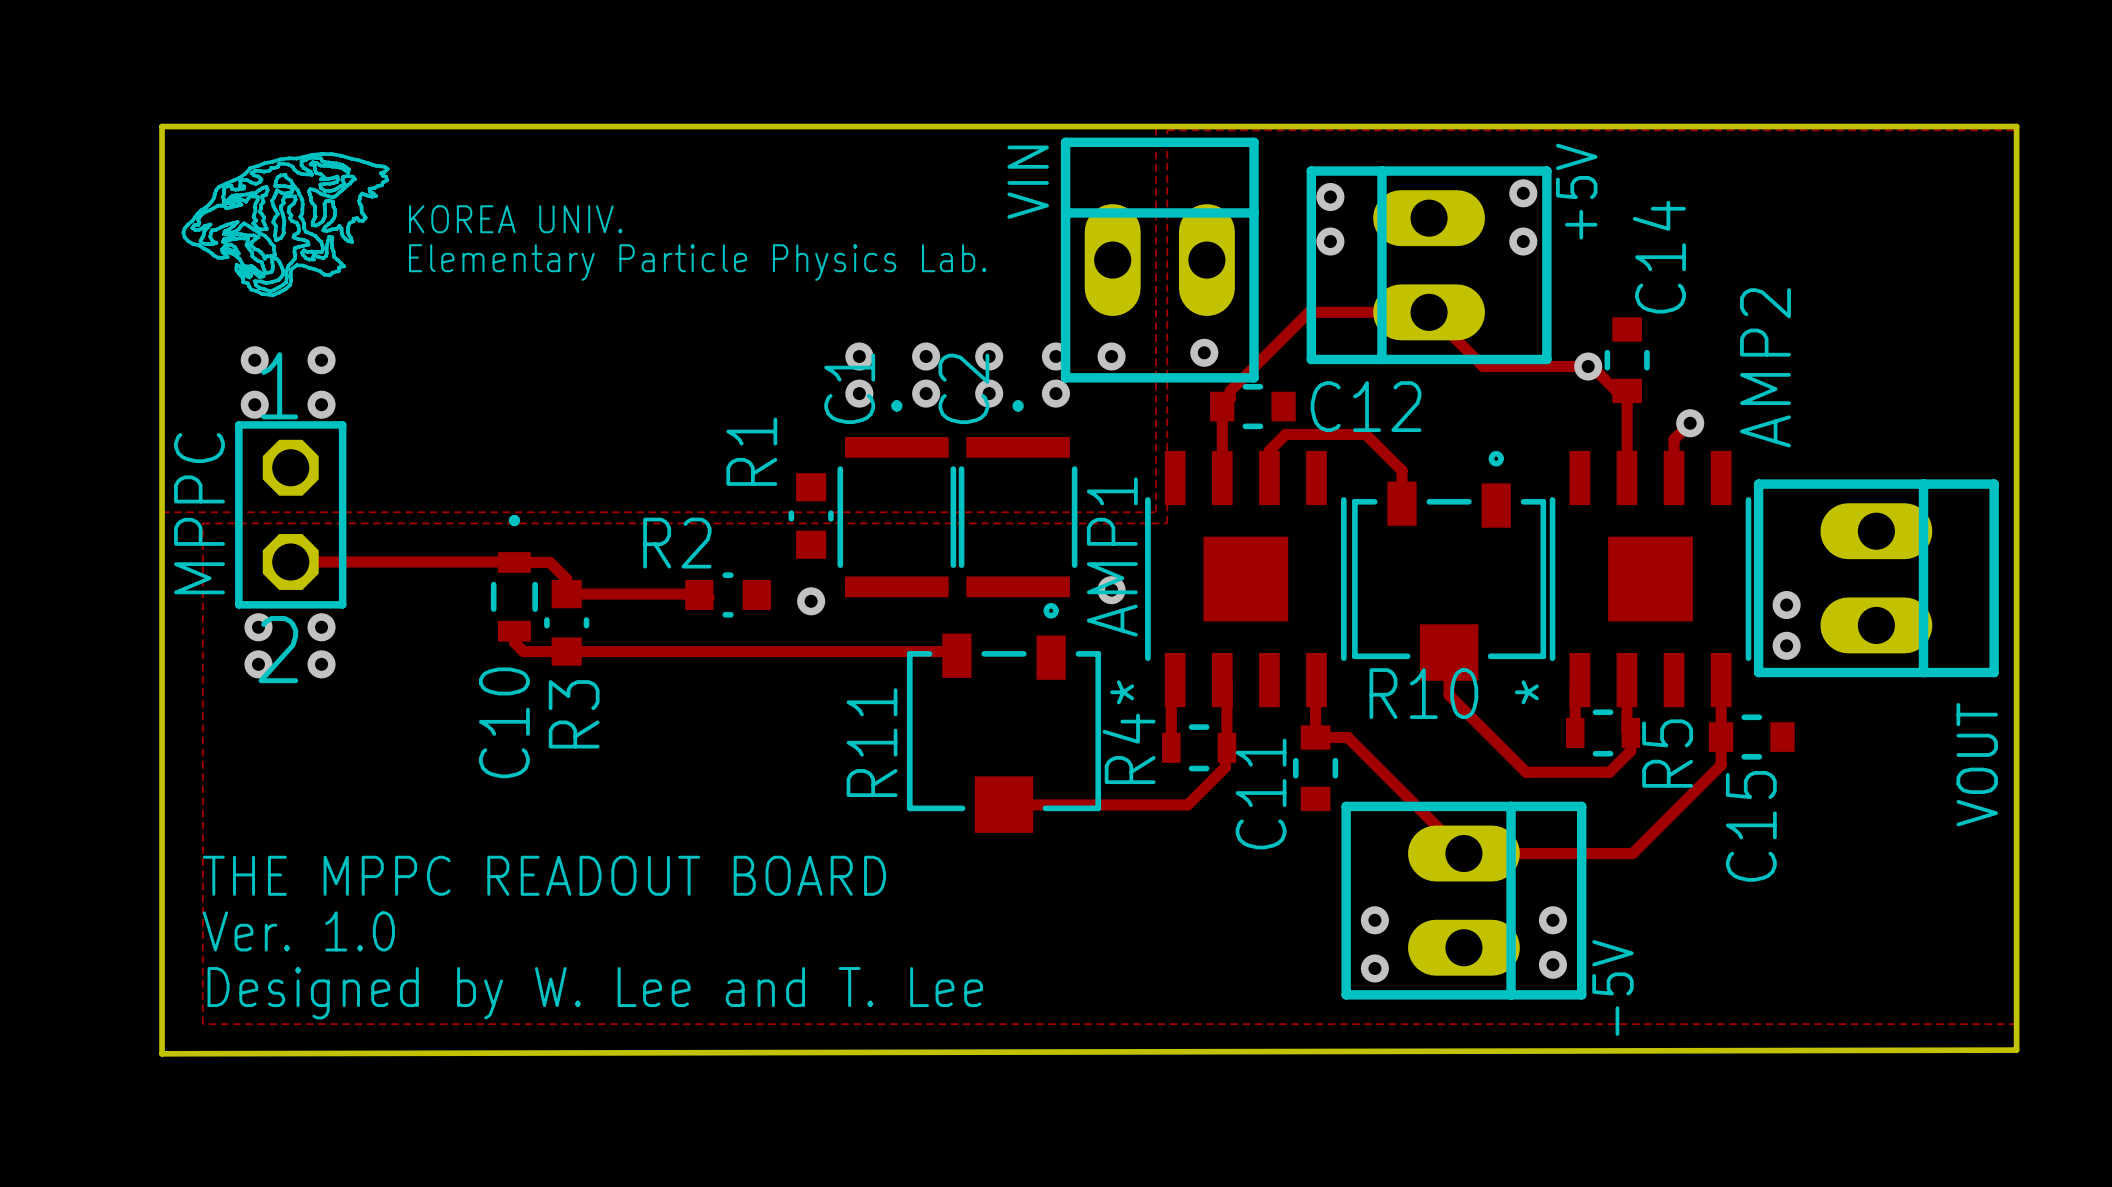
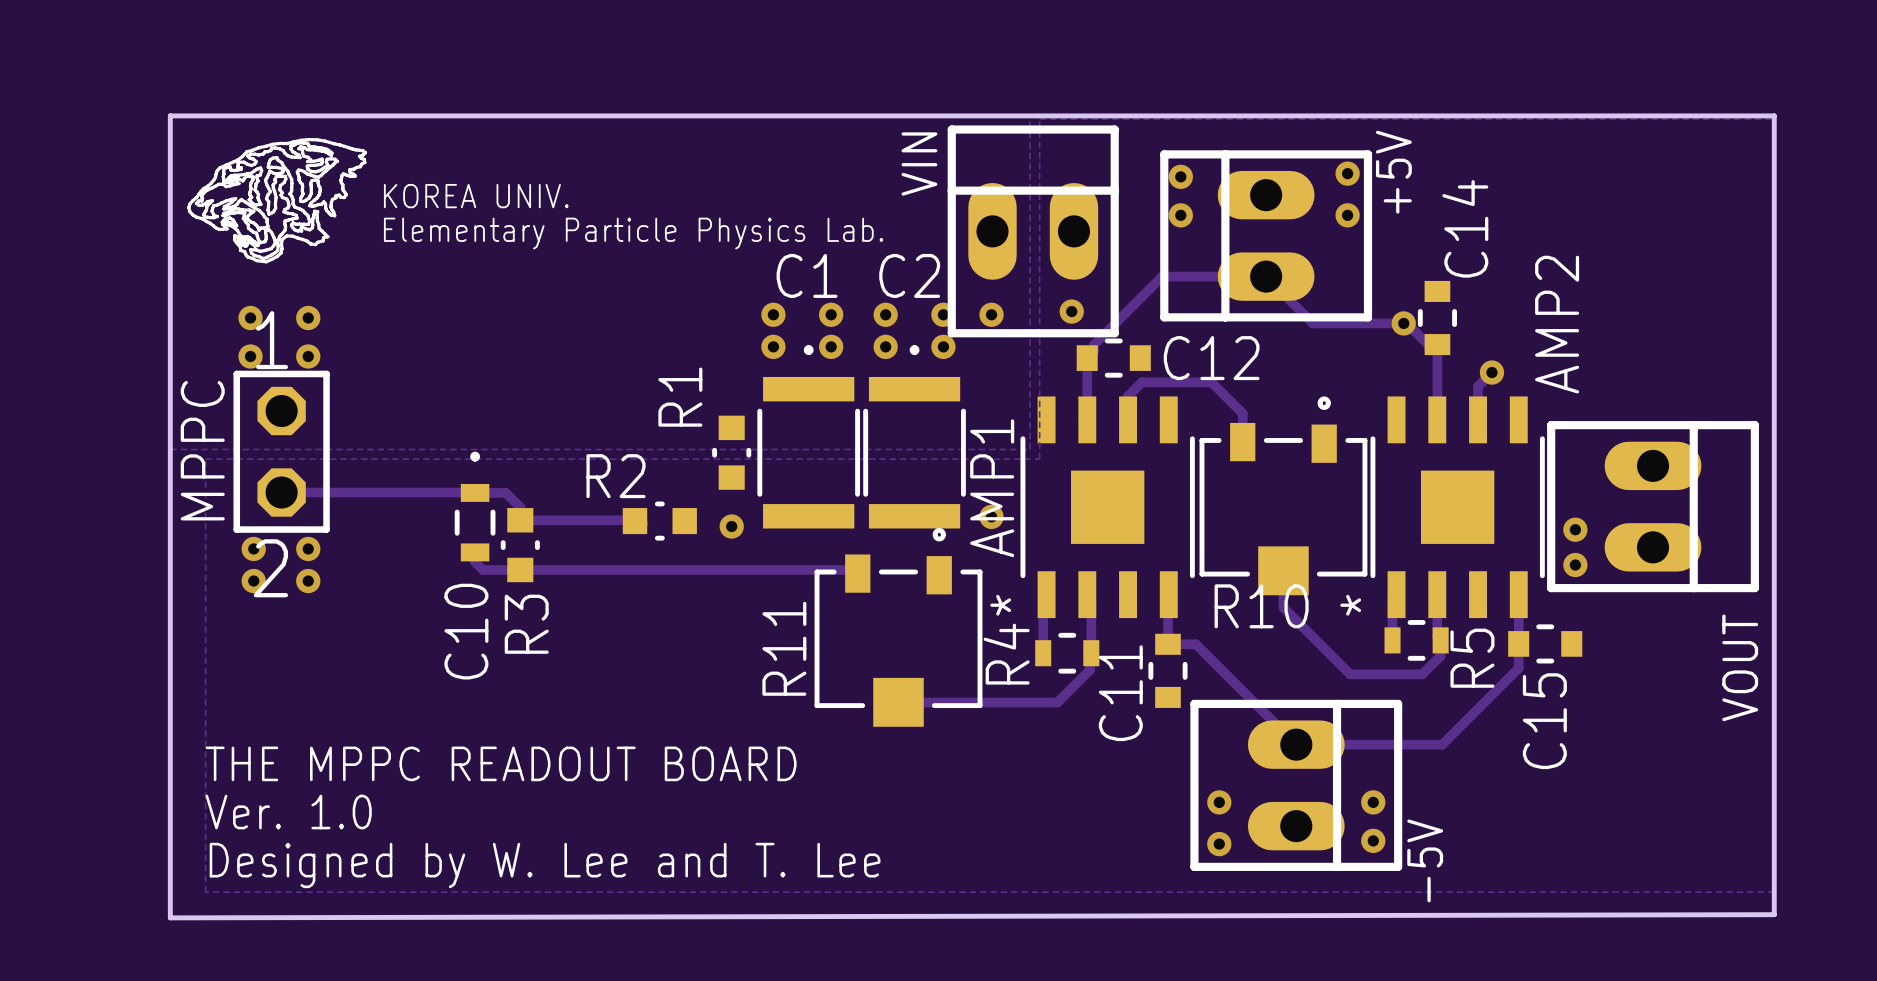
C1 name rotation: 0° (849, 388) -> 90° clockwise (807, 275)
C2 name rotation: 0° (963, 388) -> 90° clockwise (909, 275)
C1 footprint: [837, 400, 957, 598] -> [757, 345, 861, 529]
C2 footprint: [958, 400, 1078, 598] -> [863, 345, 966, 529]

